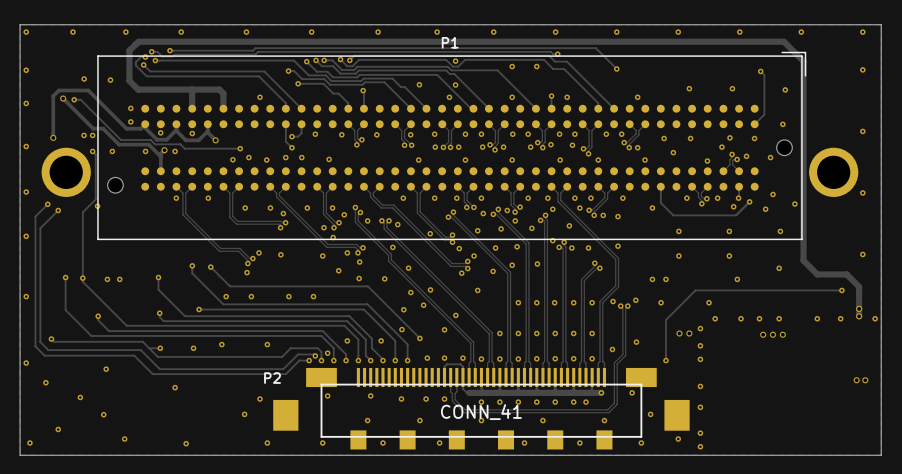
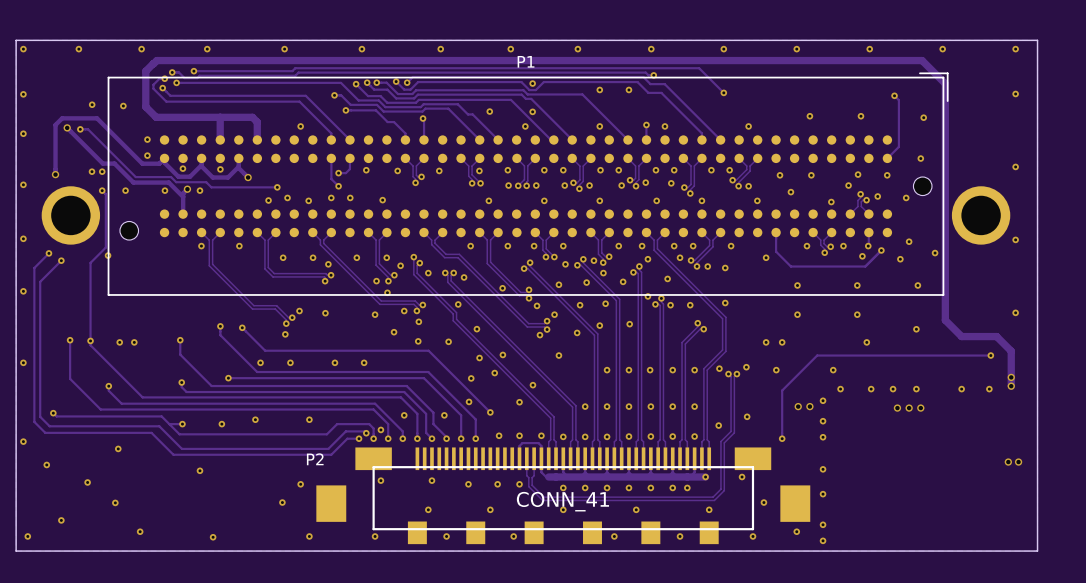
via: (875, 318) -> none

